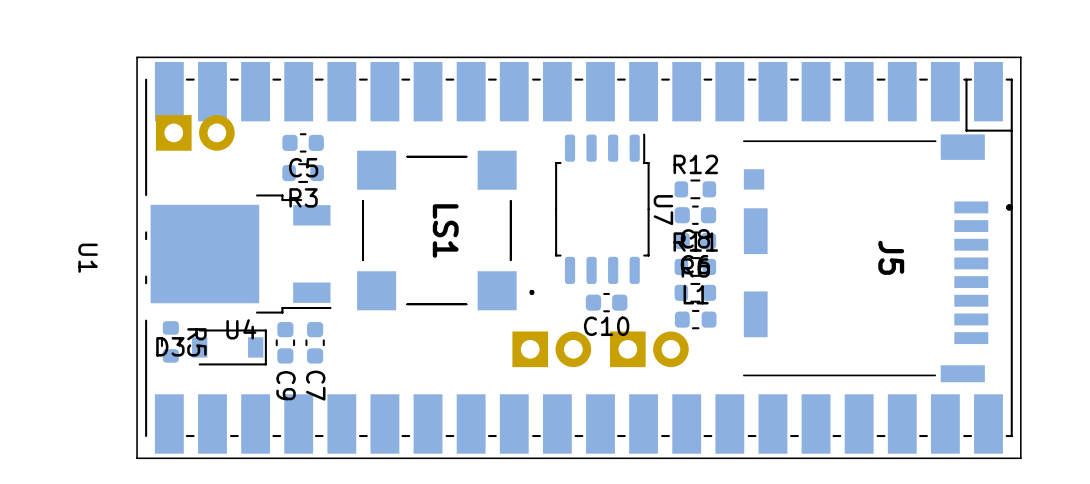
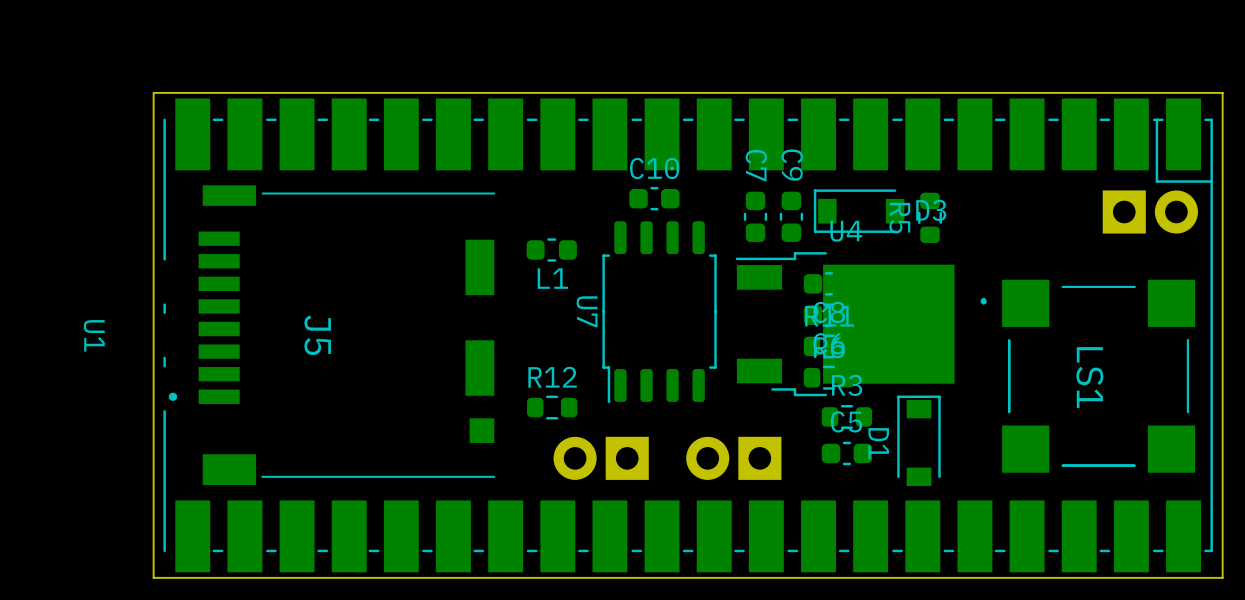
part: (195, 132) -> none
C5 position: (303, 142) -> (846, 453)
part: none -> (1150, 212)
C5 name position: C5 (303, 167) -> C5 (846, 421)
R3 position: (303, 173) -> (846, 416)
R12 position: (695, 189) -> (552, 407)
R3 name position: R3 (303, 197) -> R3 (847, 385)
U7 rotation: 0° (602, 208) -> 180° (659, 312)
LS1 rotation: 0° (445, 230) -> 180° (1087, 376)
LS1 position: (445, 230) -> (1087, 376)
U4 rotation: 0° (241, 254) -> 180° (845, 324)
U4 position: (241, 254) -> (845, 324)
J5 rotation: 0° (877, 258) -> 180° (332, 335)
J5 position: (877, 258) -> (332, 335)
L1 name position: L1 (696, 294) -> L1 (552, 278)
C10 position: (606, 302) -> (654, 198)
L1 position: (695, 319) -> (551, 249)
C10 name position: C10 (606, 326) -> C10 (654, 168)
R5 position: (170, 341) -> (930, 217)
R5 name position: R5 (196, 342) -> R5 (899, 218)
C9 position: (285, 342) -> (791, 216)
C7 position: (315, 342) -> (755, 216)
D1: none -> (918, 440)
D3 rotation: 0° (229, 347) -> 180° (859, 211)
D3 position: (229, 347) -> (859, 211)
part: (551, 349) -> none
part: (649, 349) -> none
part: none -> (601, 458)
part: none -> (733, 458)
C9 name position: C9 (286, 385) -> C9 (792, 165)
C7 name position: C7 (315, 385) -> C7 (756, 165)

